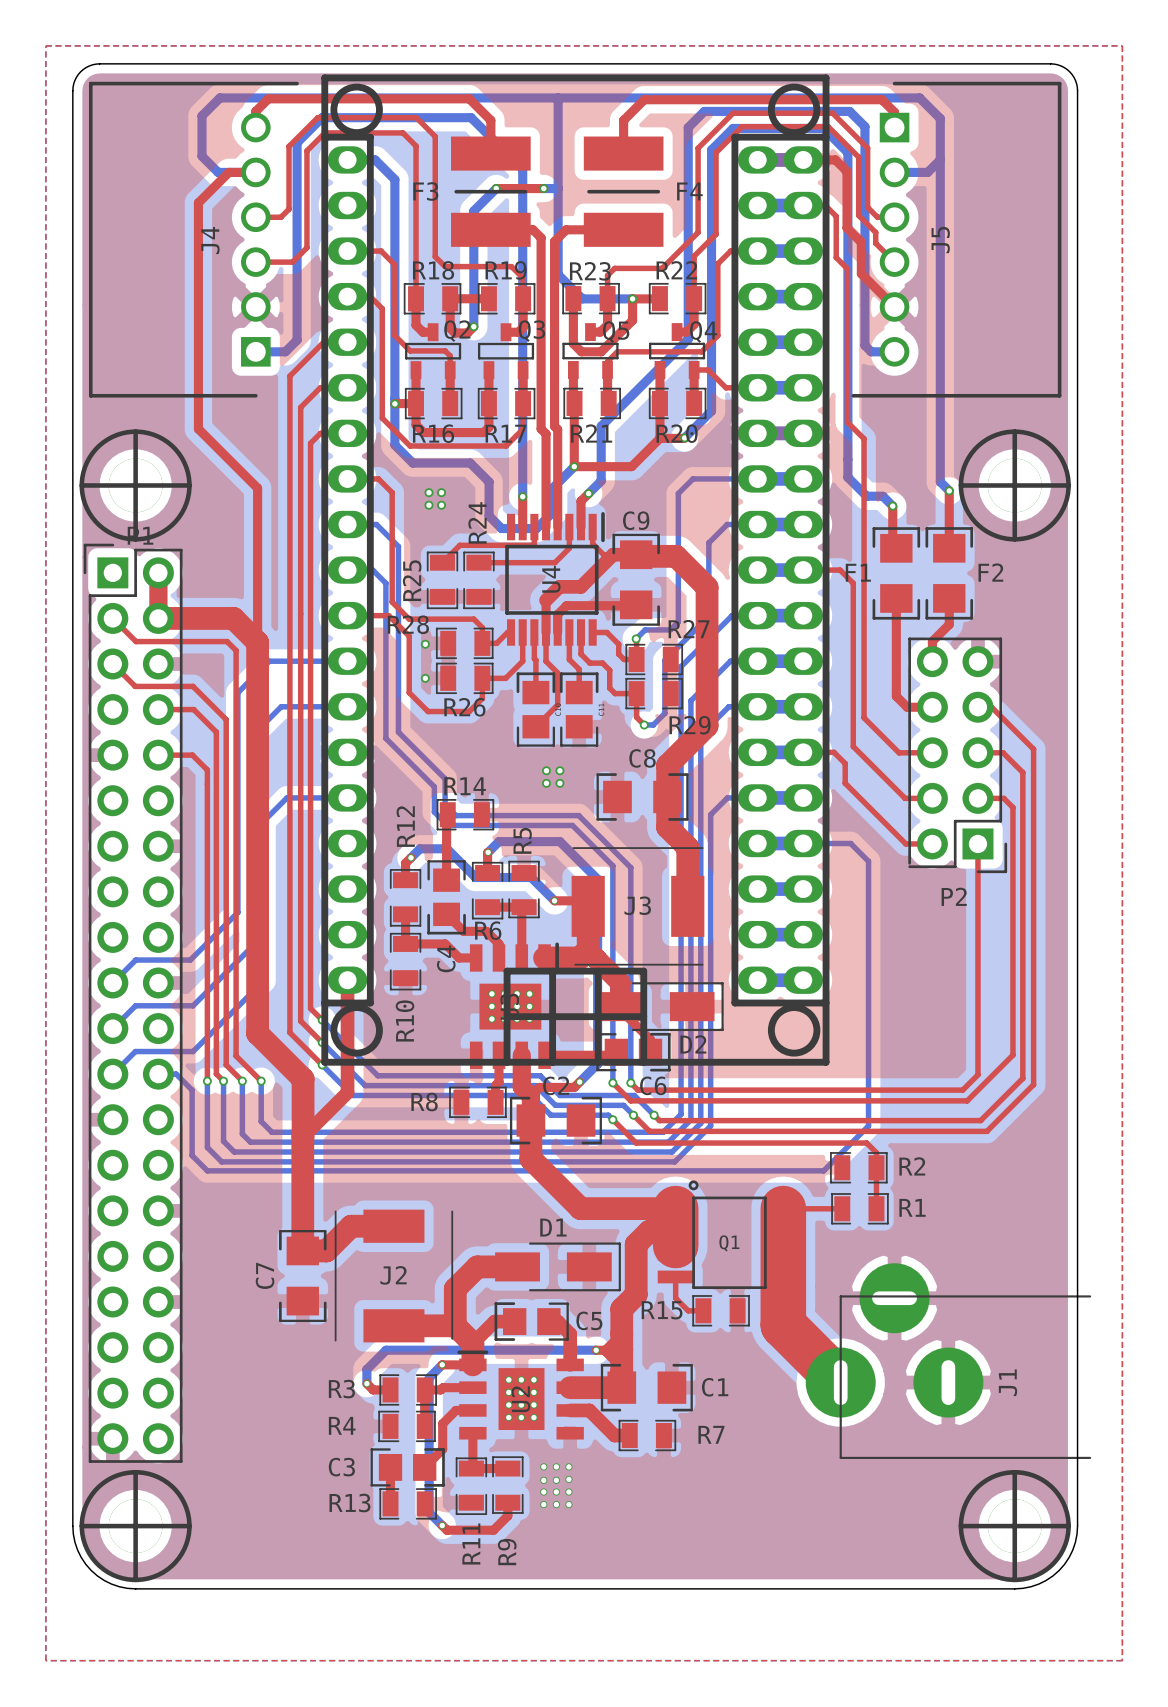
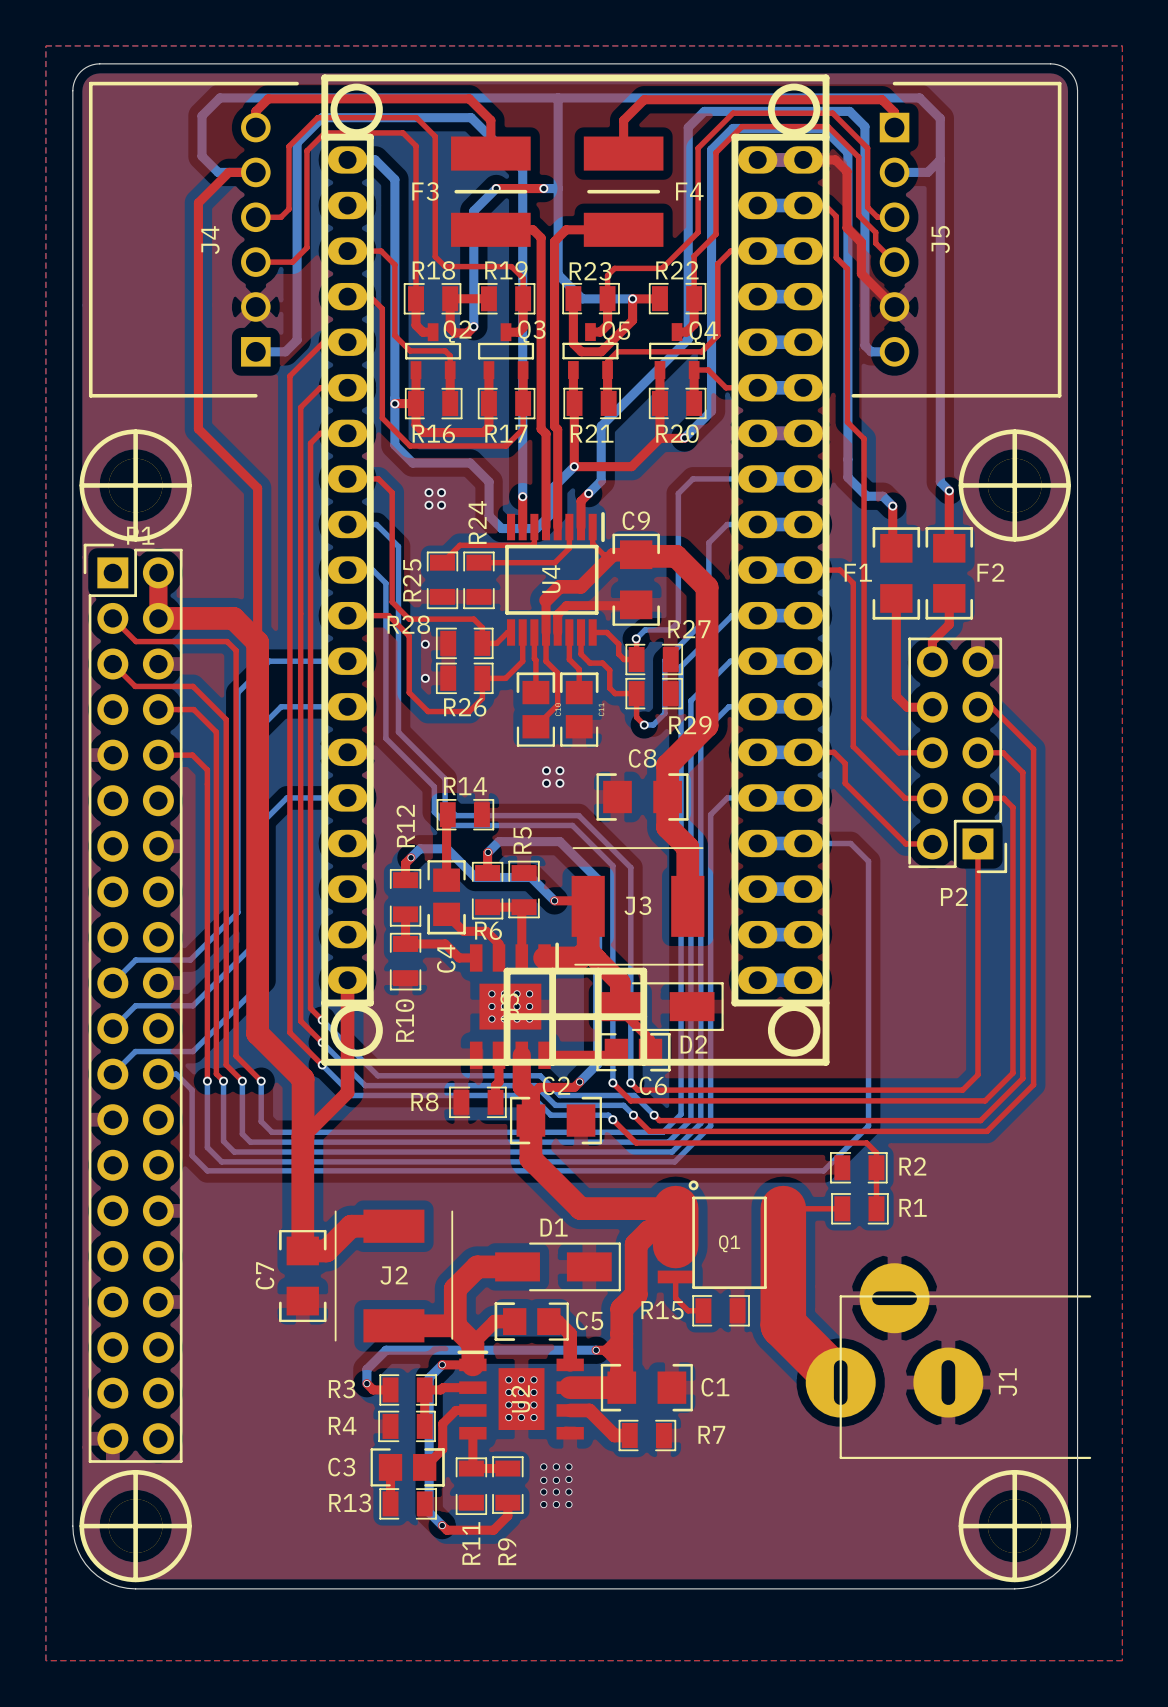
top track: (1012, 1055) (967, 1100) -> (1012, 1055) (1012, 1073) (985, 1100) (967, 1100)

